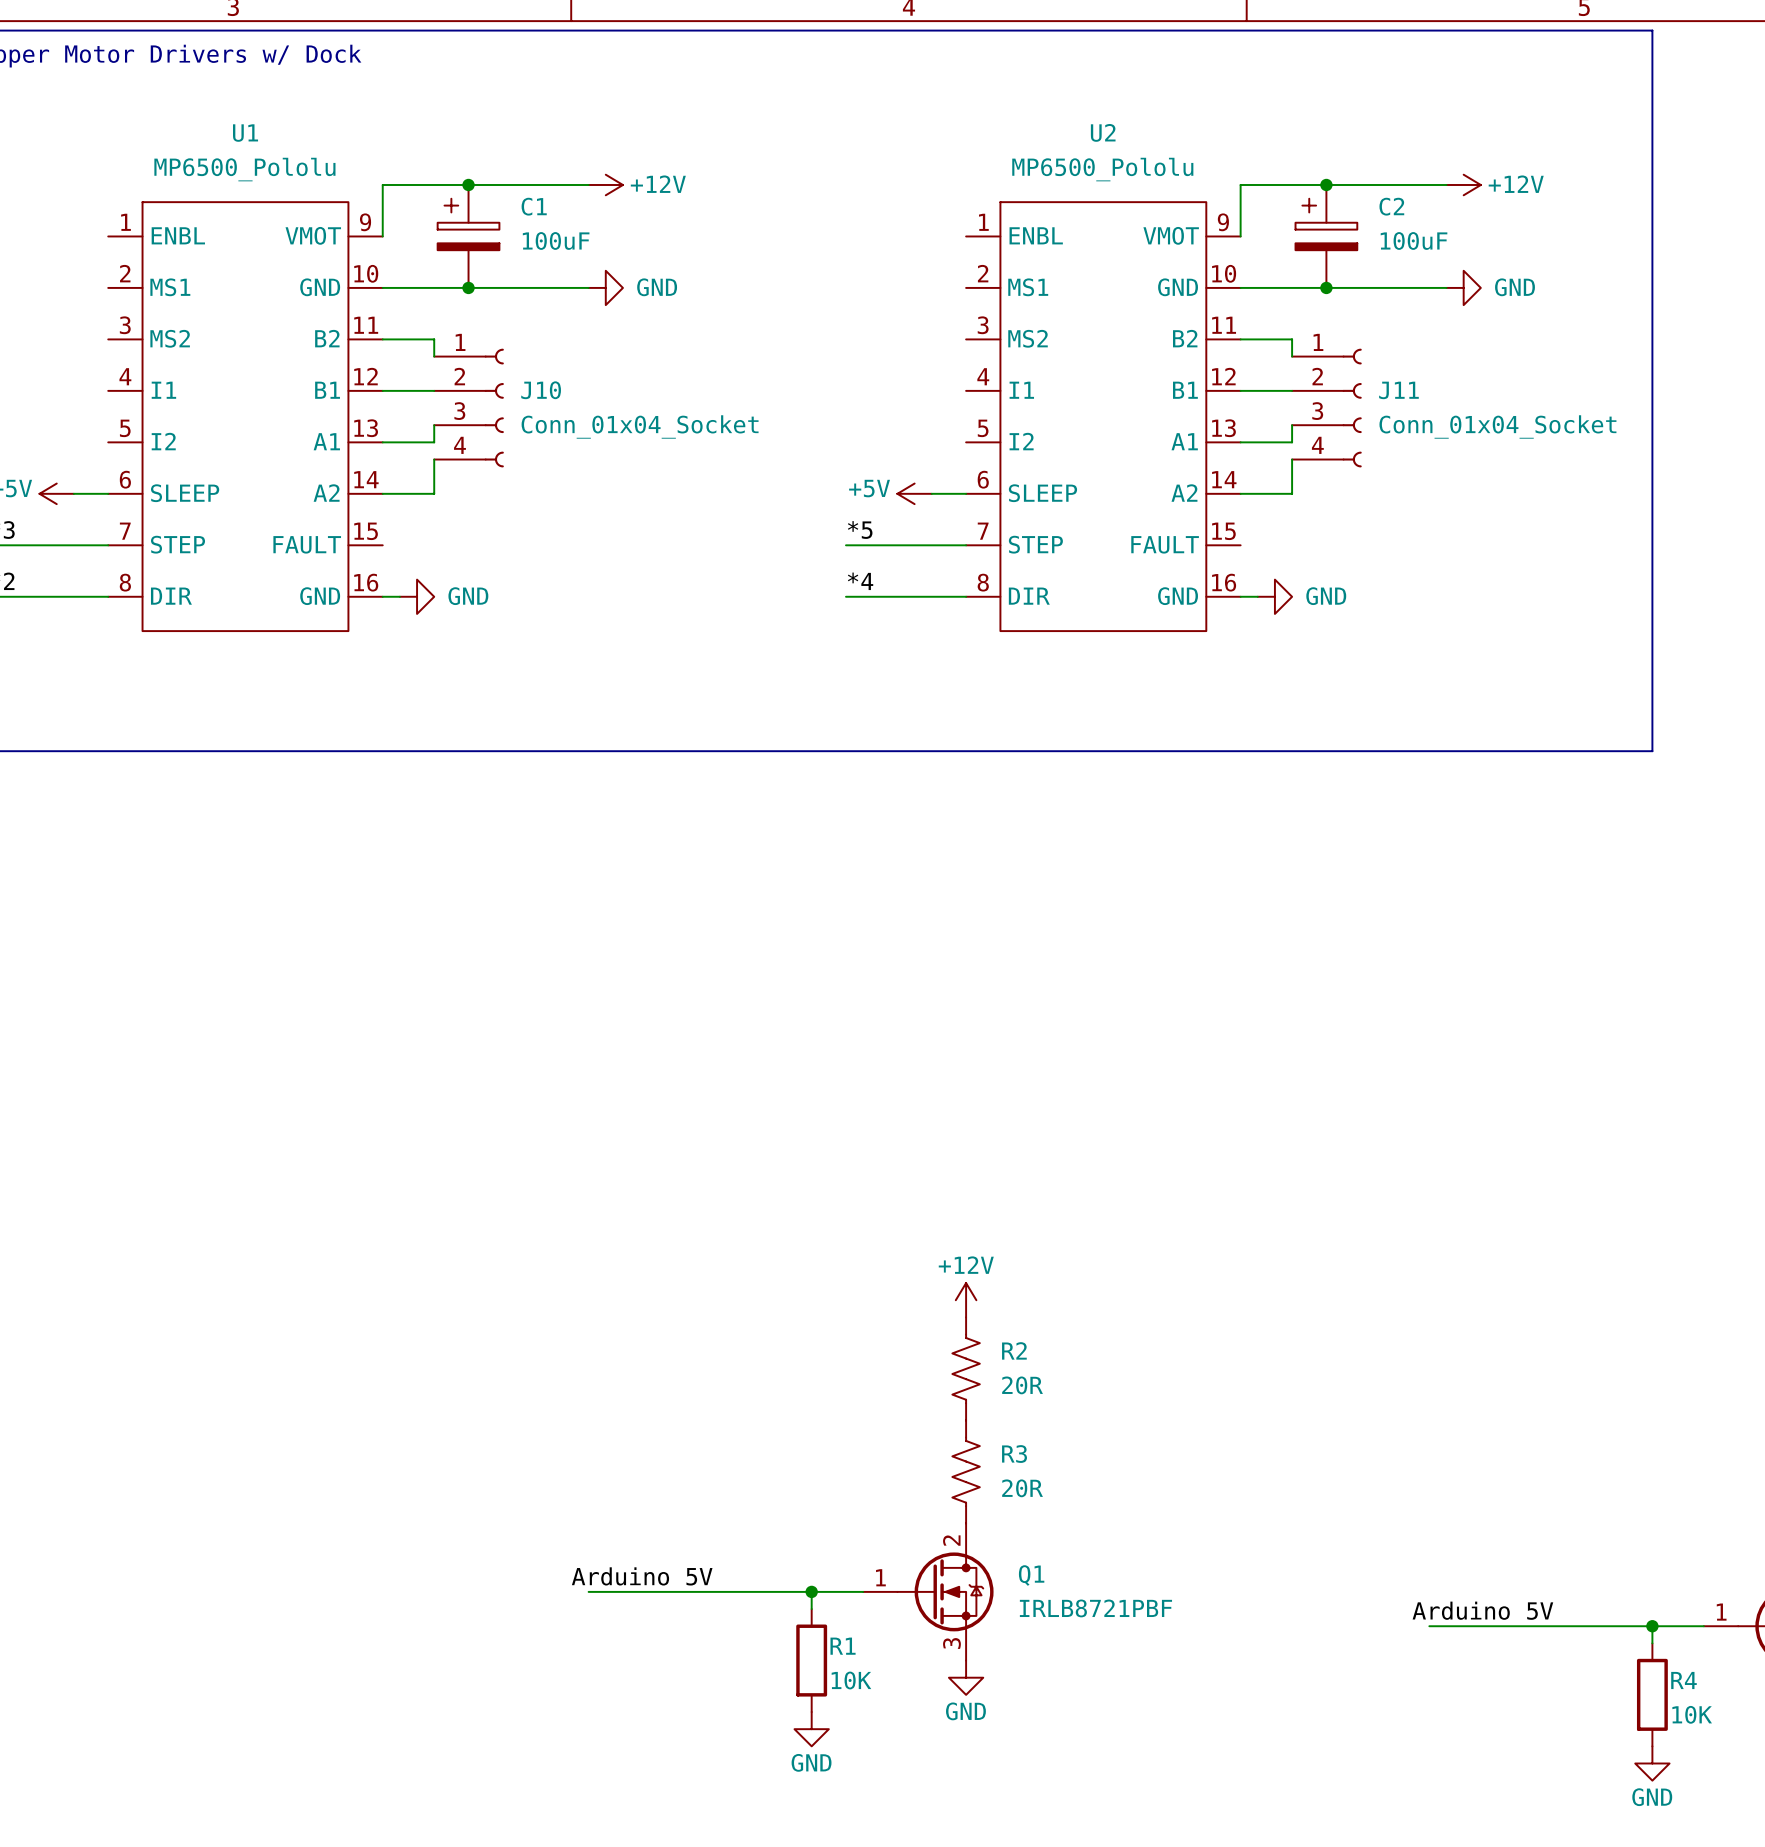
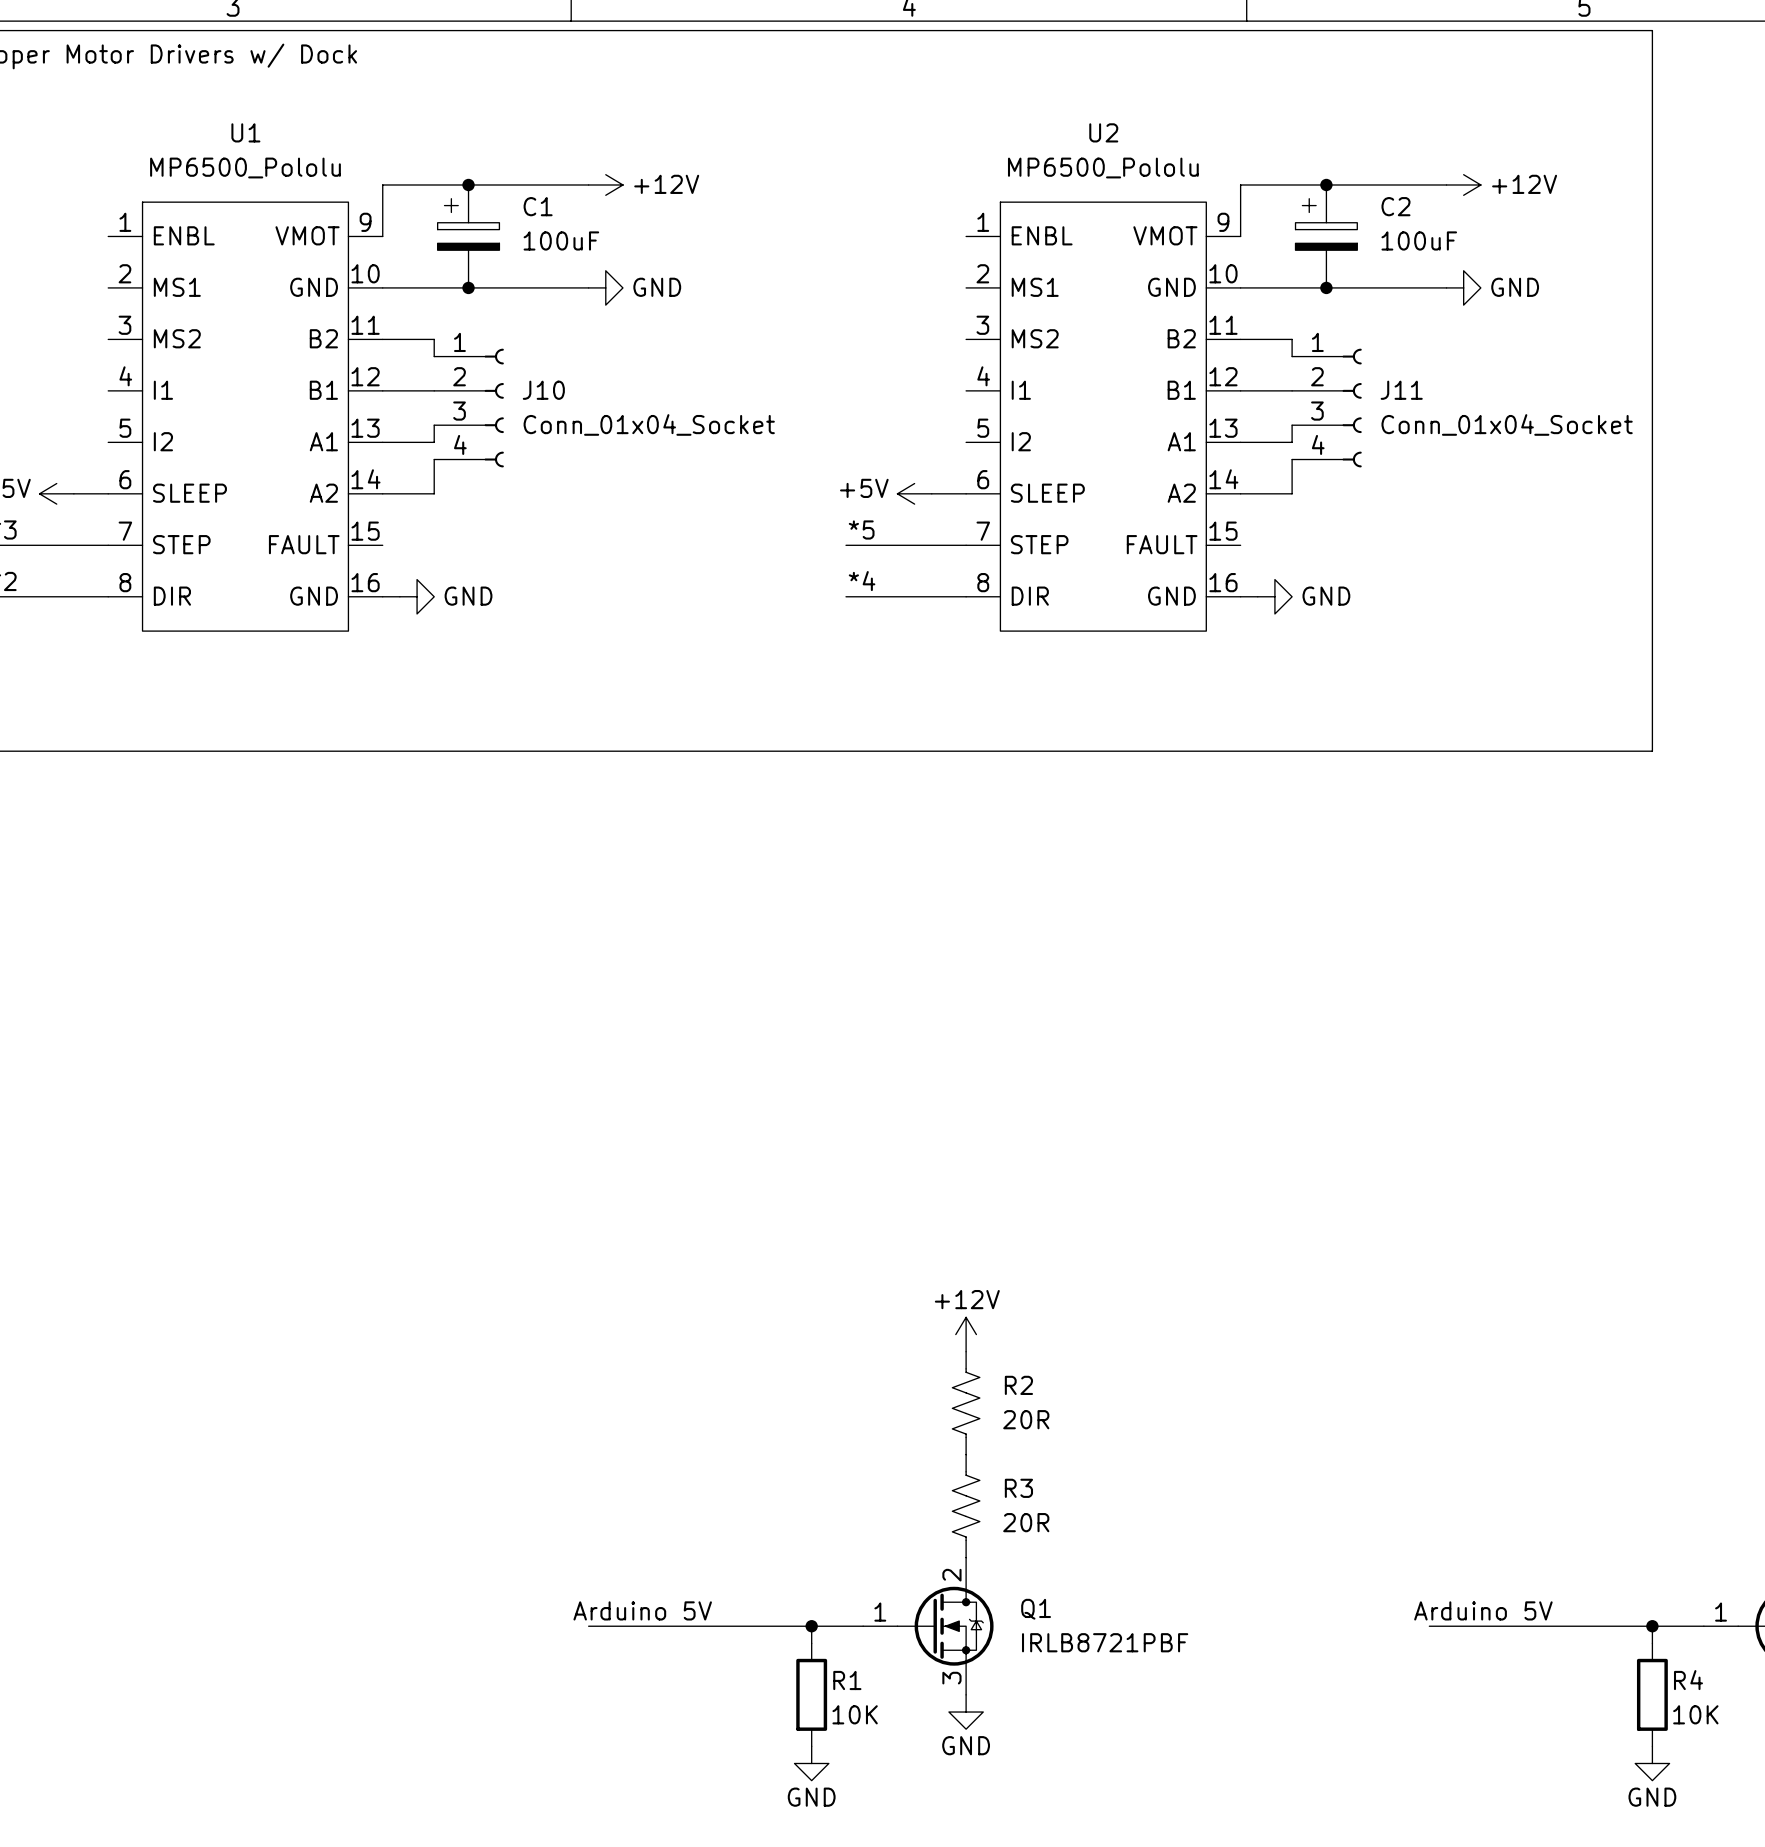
power symbol position: +12V (966, 1300) -> +12V (966, 1334)
R2 position: (966, 1368) -> (966, 1403)
R3 position: (966, 1471) -> (966, 1506)
label position: Arduino 5V (642, 1576) -> Arduino 5V (642, 1610)
wire: (588, 1591) (863, 1591) -> (588, 1626) (863, 1626)
wire: (811, 1591) (811, 1609) -> (811, 1626) (811, 1643)
junction position: (811, 1591) -> (811, 1626)
Q1 position: (928, 1591) -> (928, 1626)
R1 position: (811, 1660) -> (811, 1694)
power symbol position: GND (966, 1677) -> GND (966, 1712)
power symbol position: GND (811, 1729) -> GND (811, 1763)

